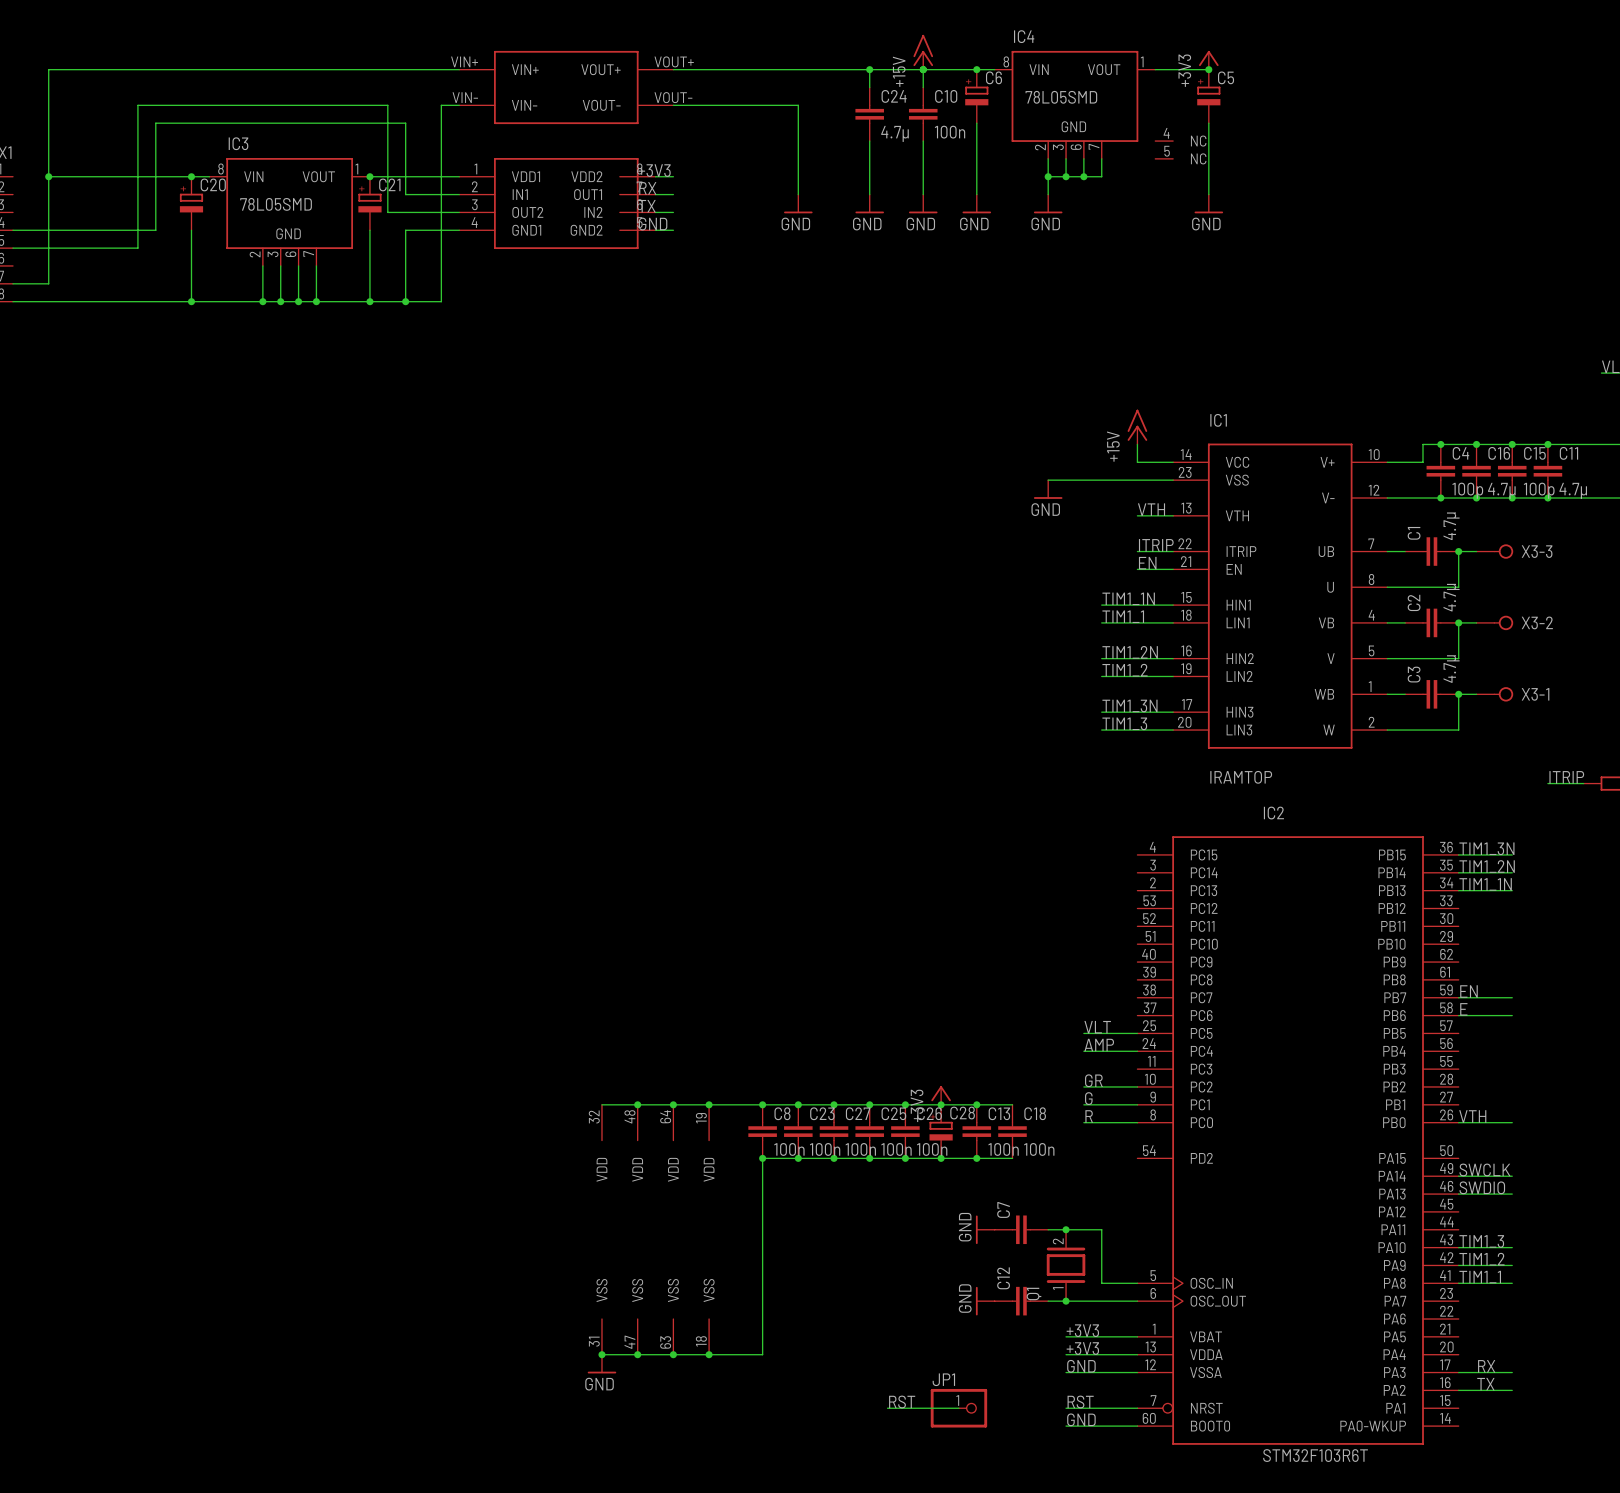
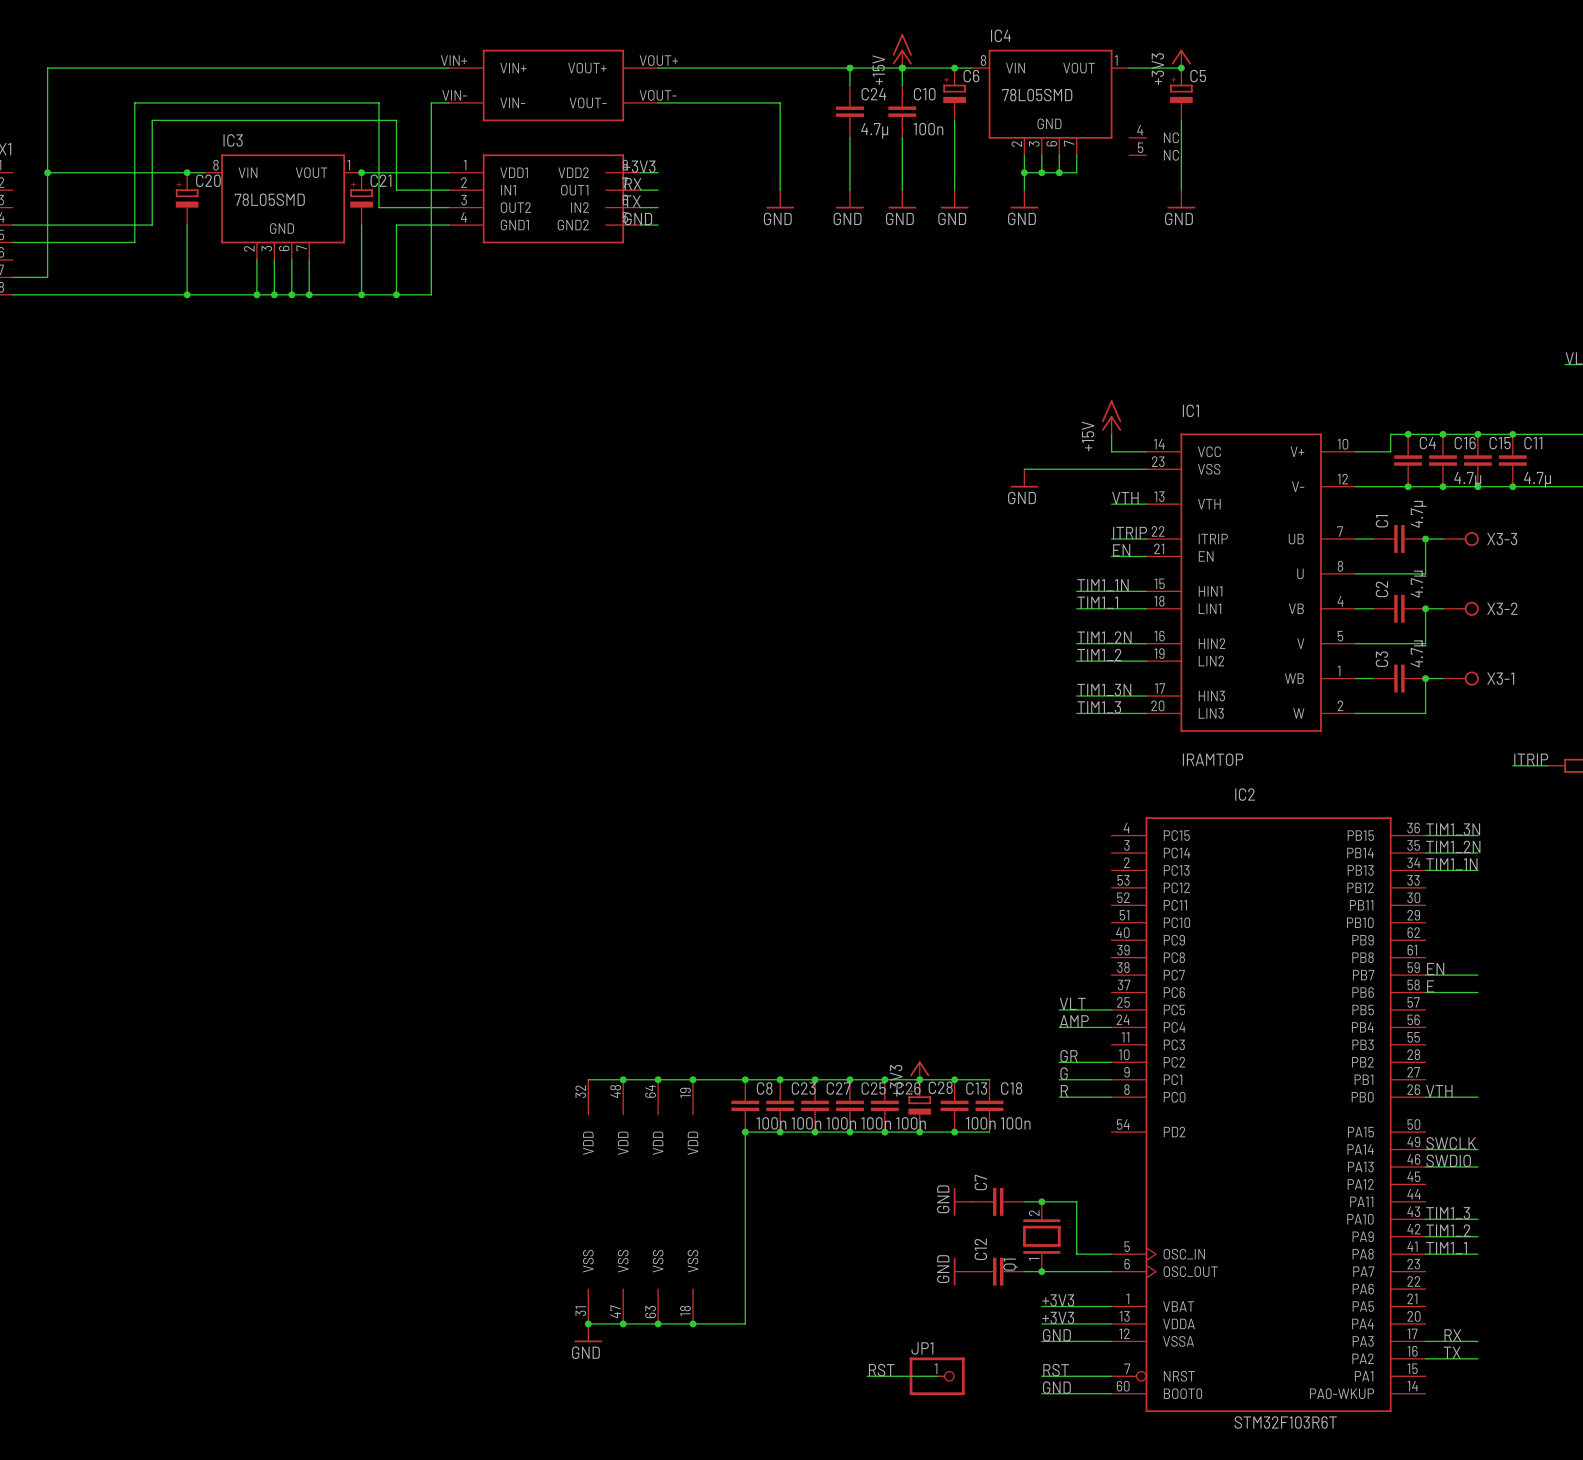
C4 value: 100p (1467, 490) -> none
C15 value: 100p (1539, 490) -> none

